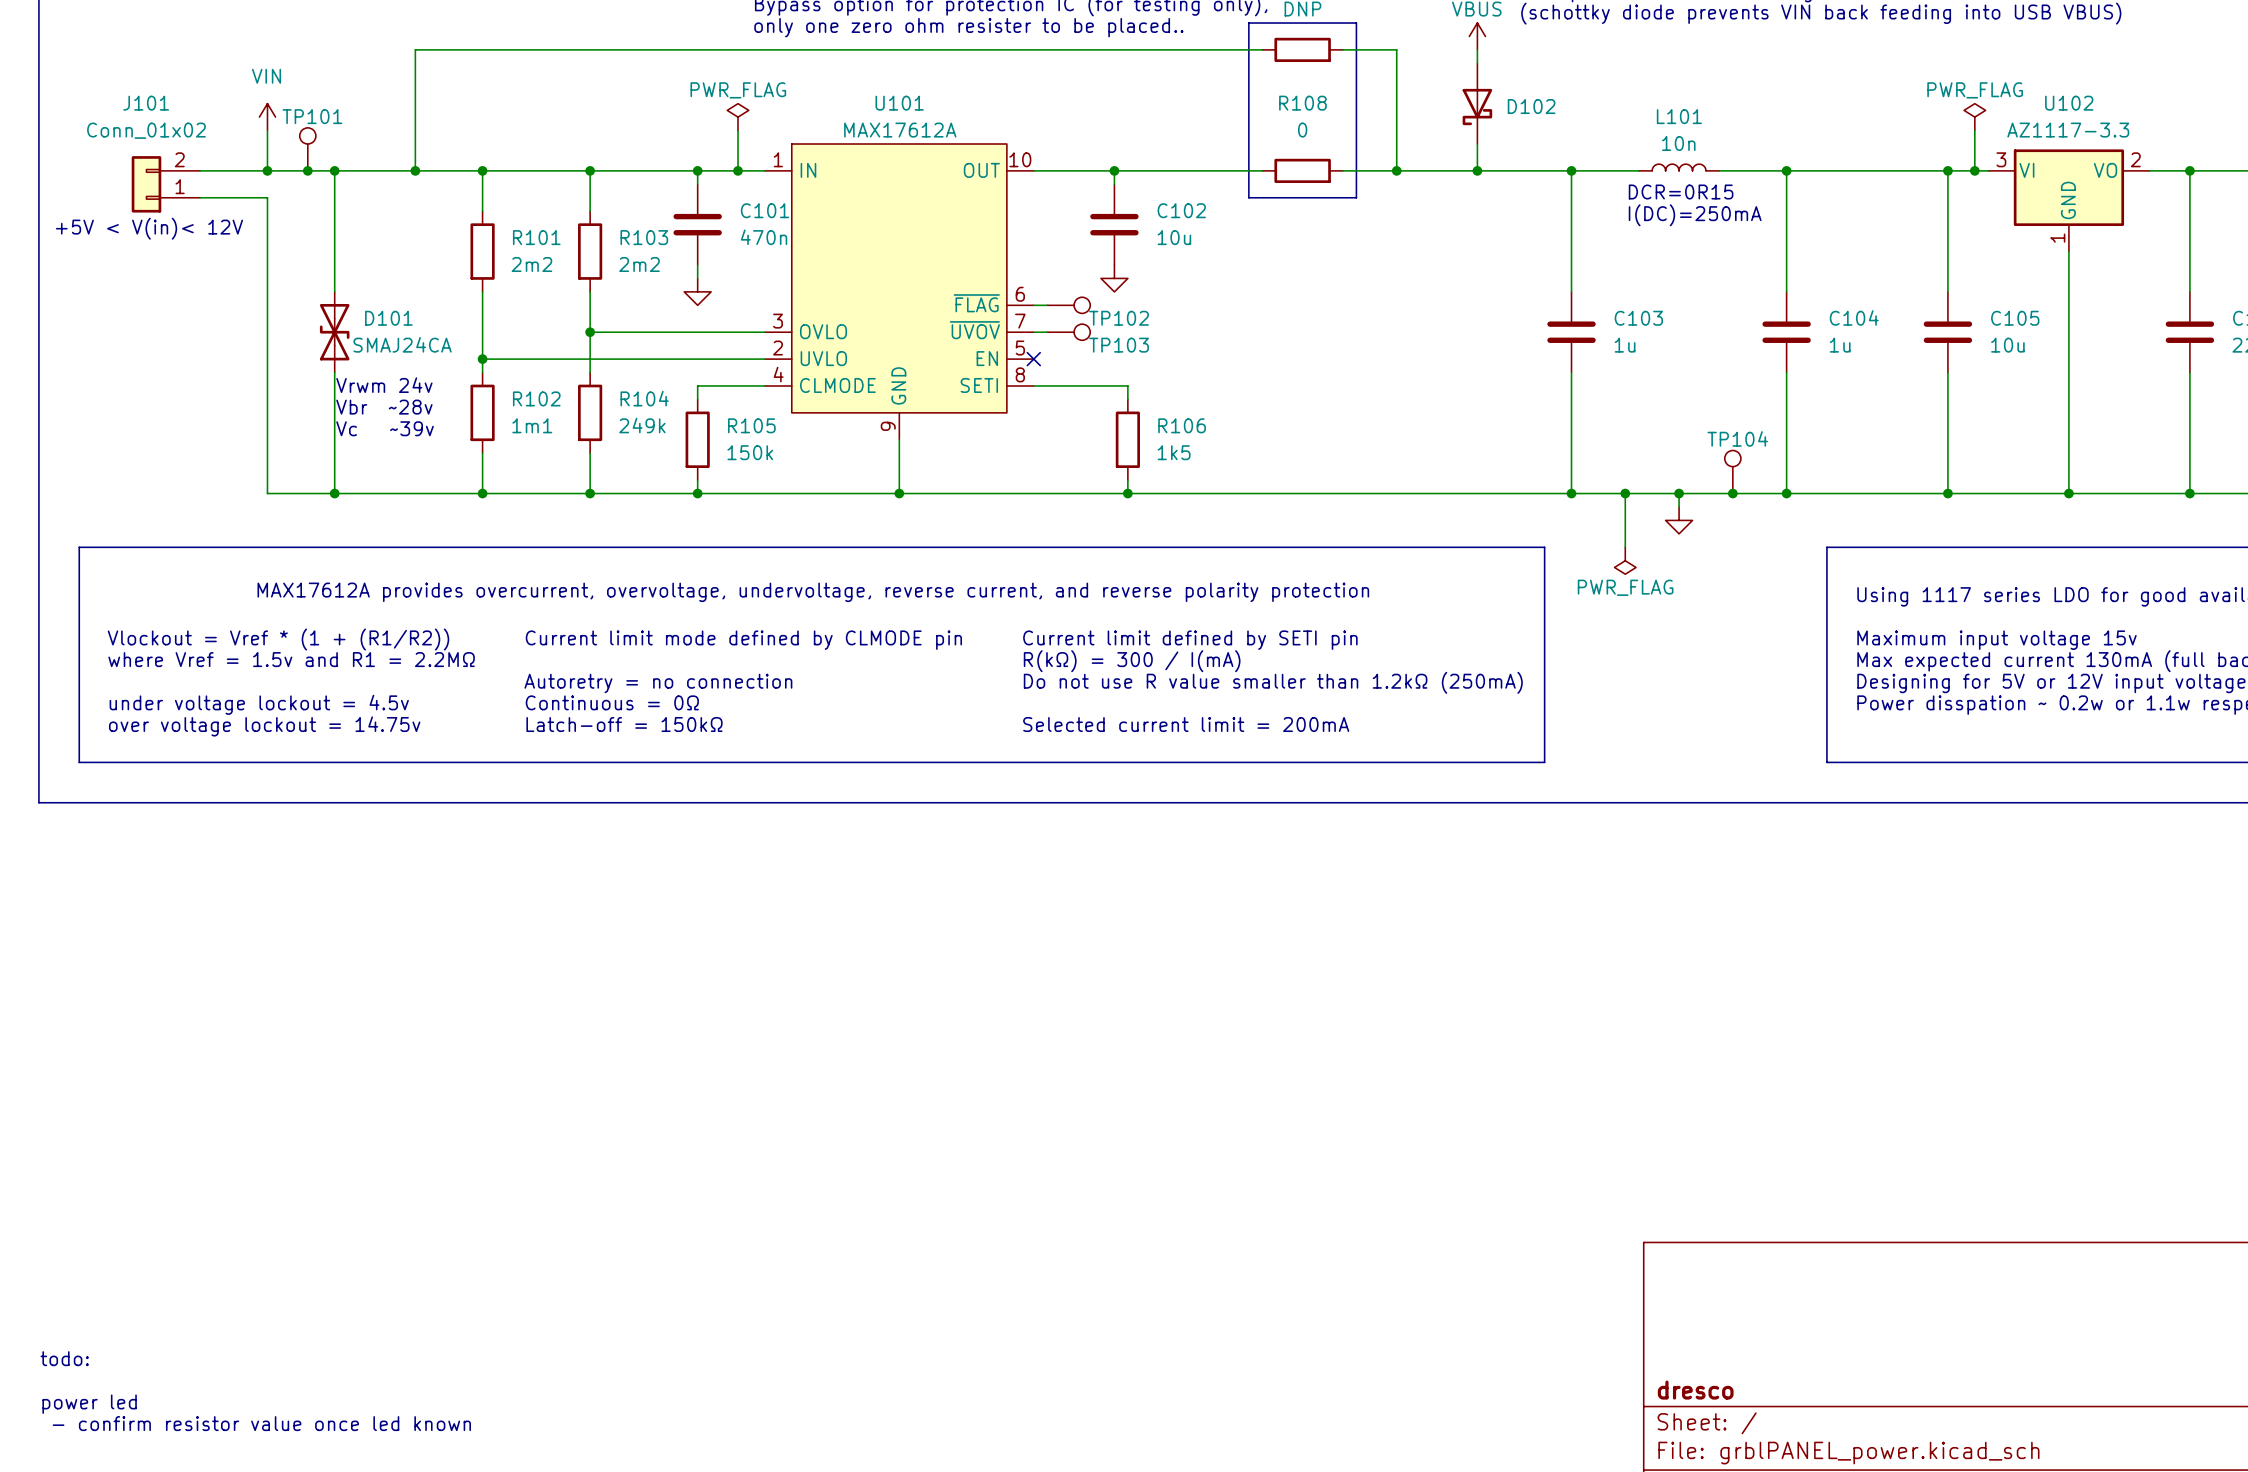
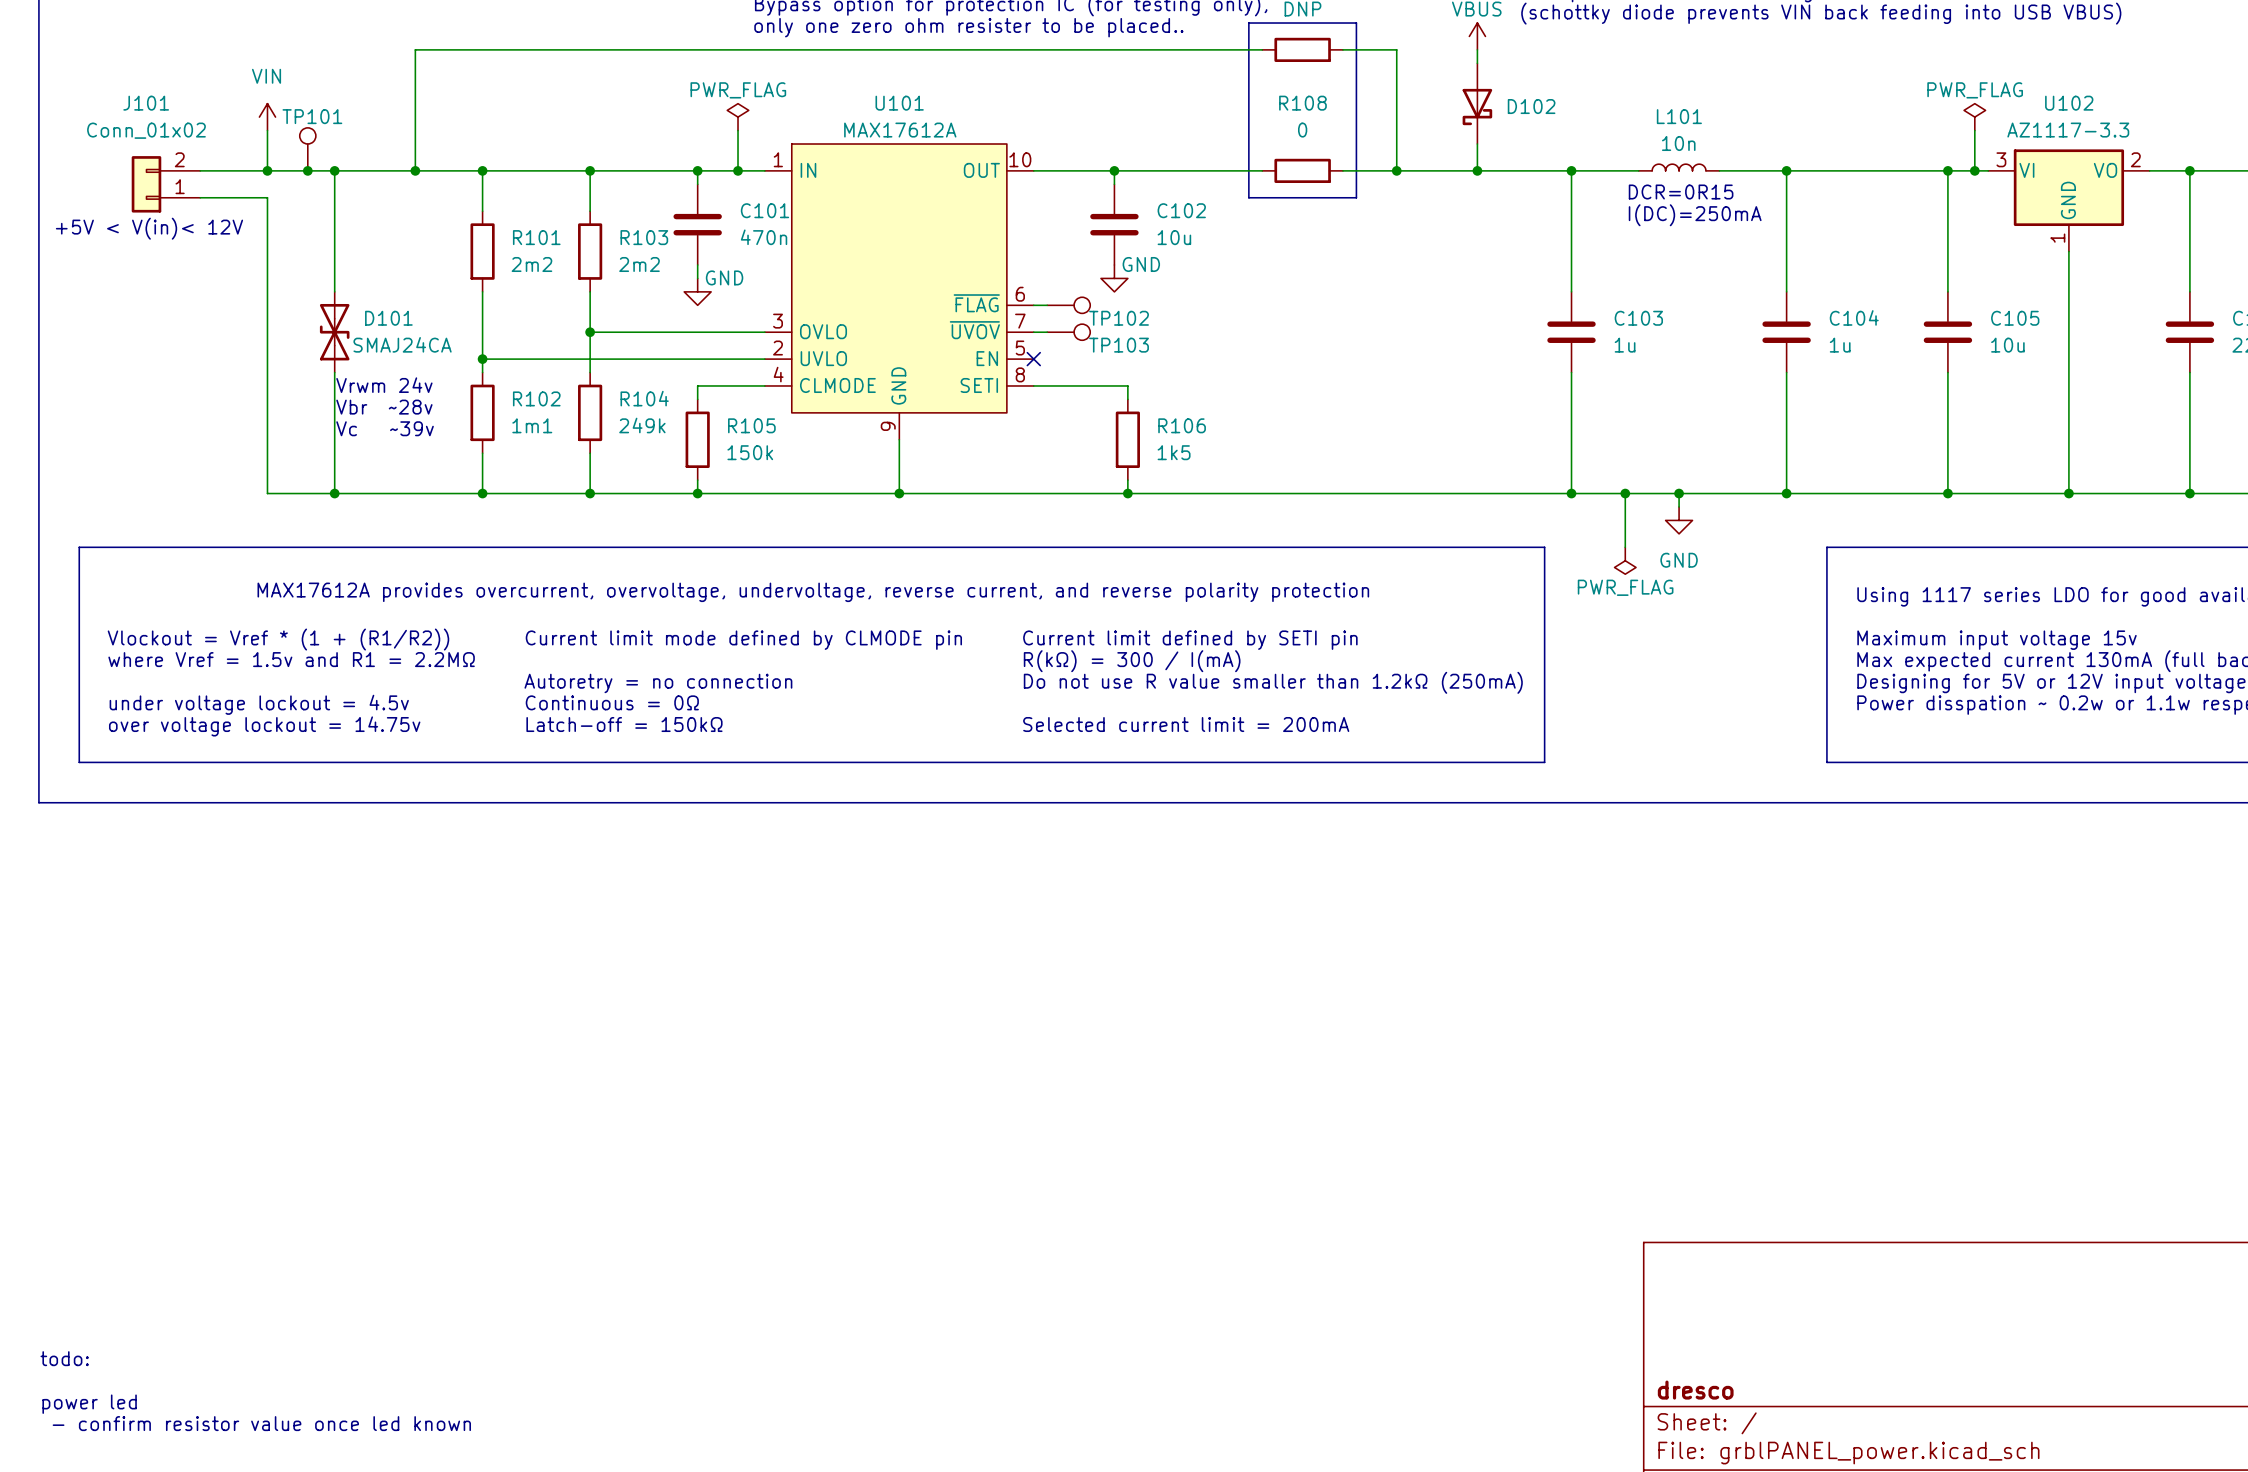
power symbol text: none -> GND (1141, 264)
power symbol text: none -> GND (724, 277)
TP104: (1732, 472) -> none
junction: (1732, 493) -> none
power symbol text: none -> GND (1679, 560)

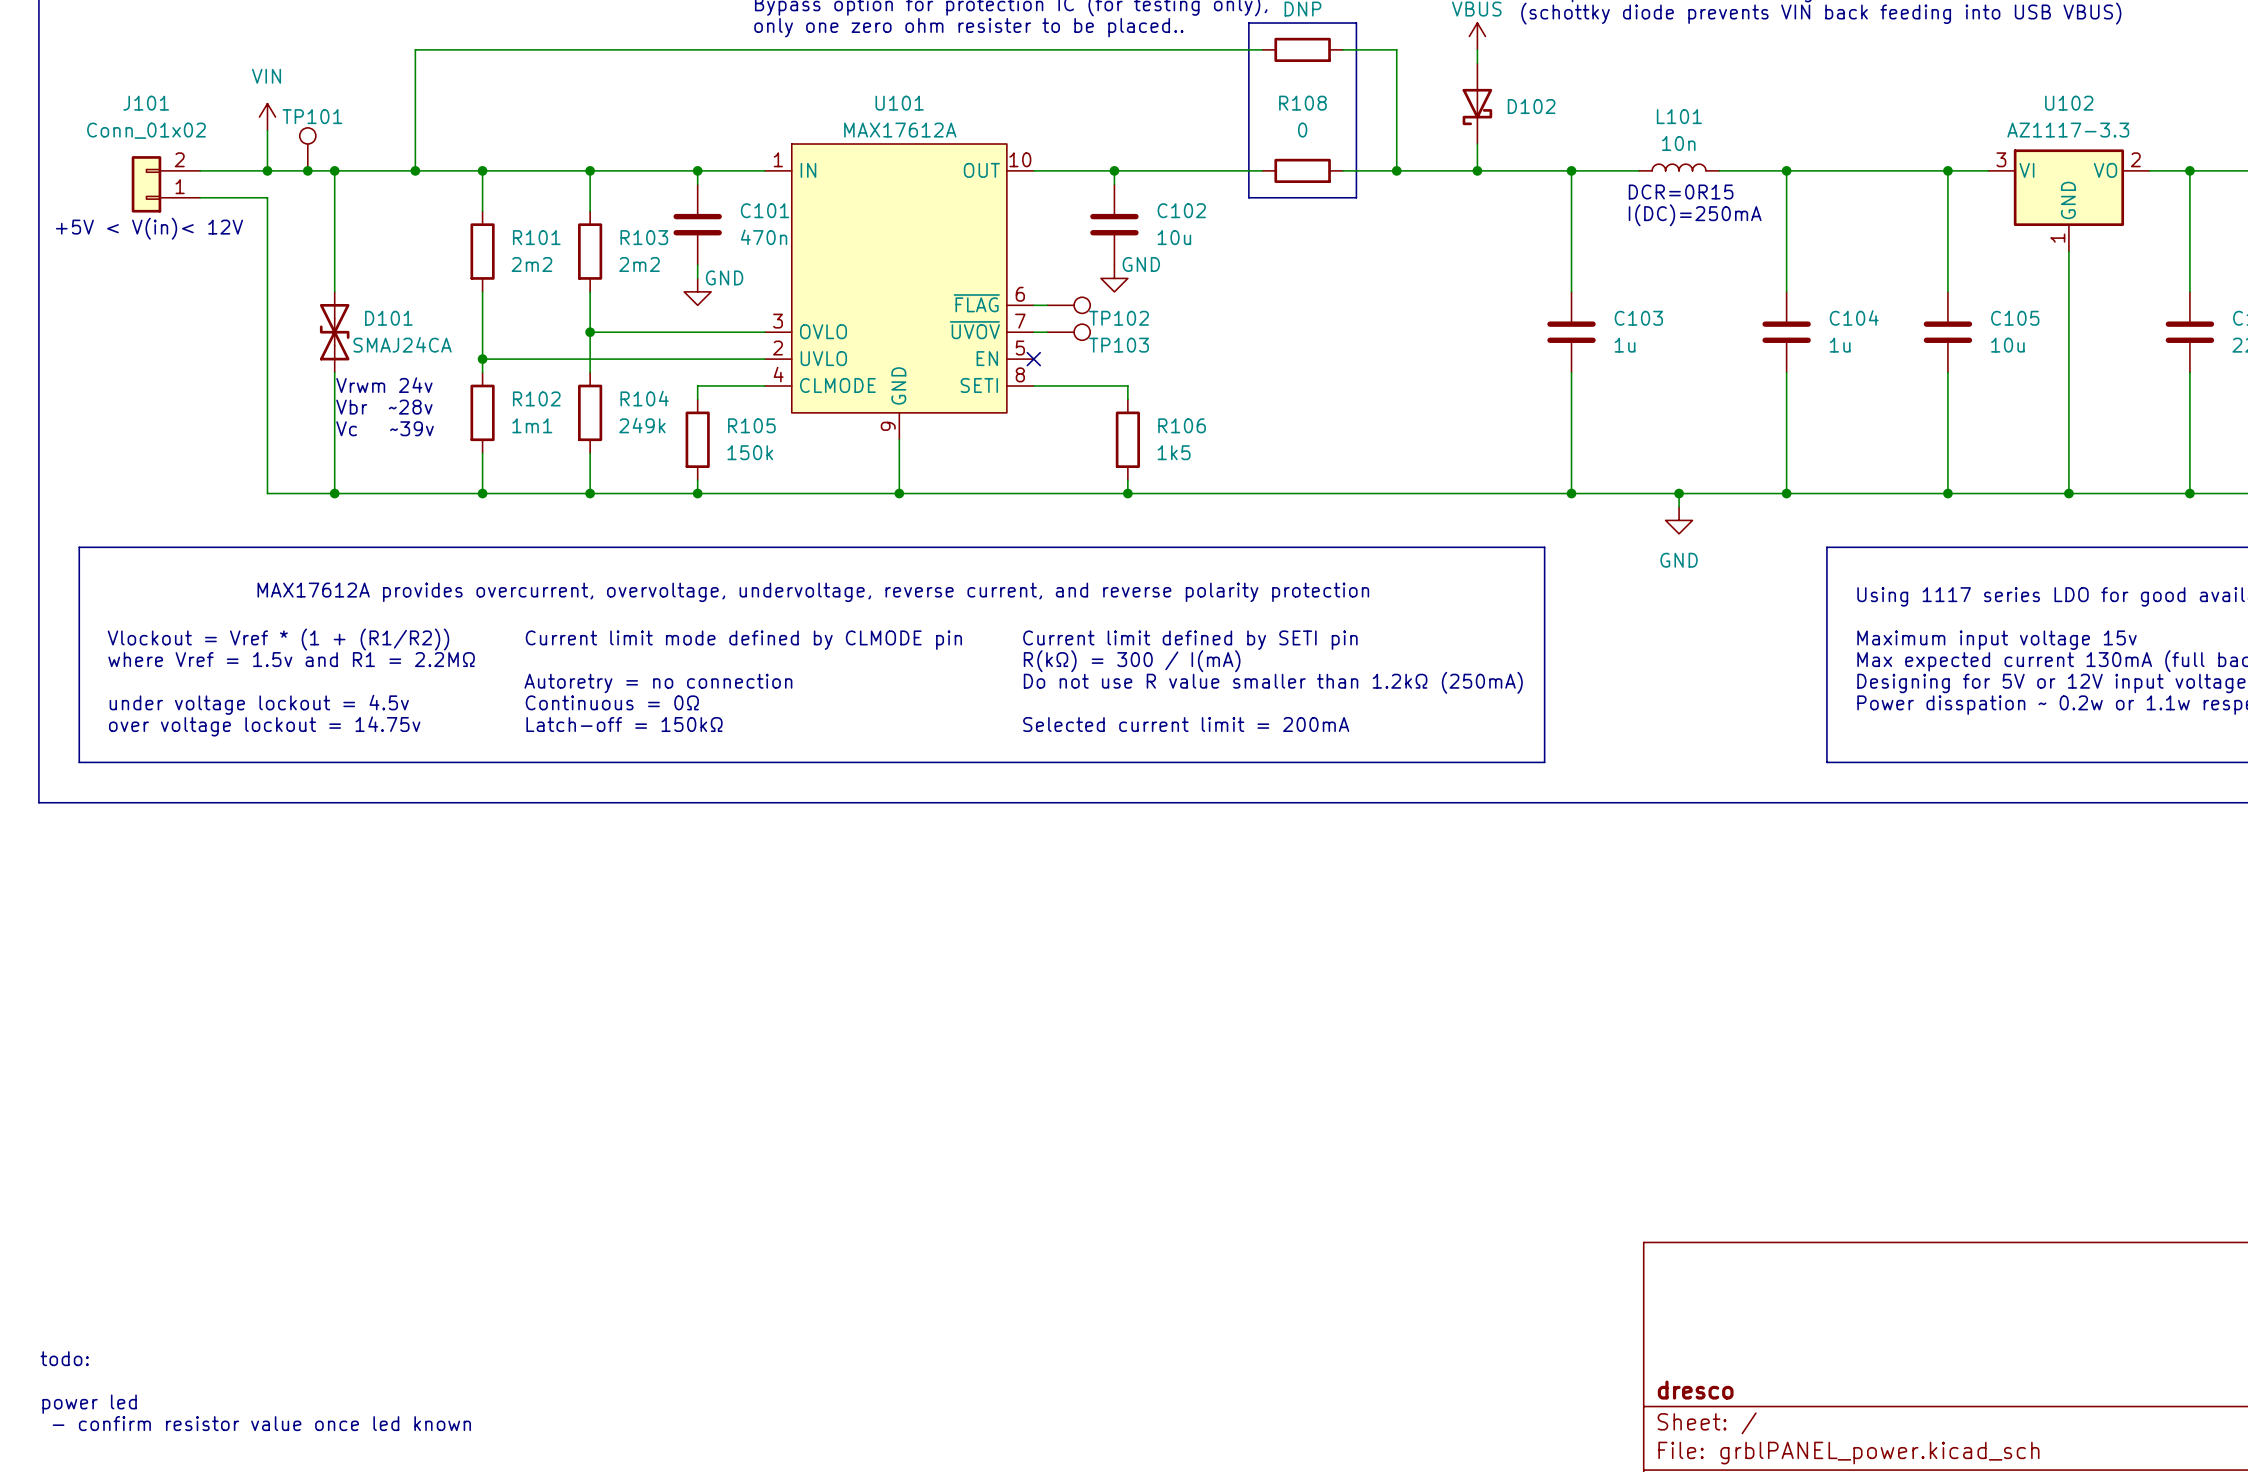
power symbol: PWR_FLAG (738, 117) -> none
power symbol: PWR_FLAG (1974, 117) -> none
wire: (738, 130) (738, 170) -> none
wire: (1974, 130) (1974, 170) -> none
junction: (738, 170) -> none
junction: (1974, 170) -> none
wire: (1625, 493) (1625, 547) -> none
junction: (1625, 493) -> none
power symbol: PWR_FLAG (1625, 560) -> none

